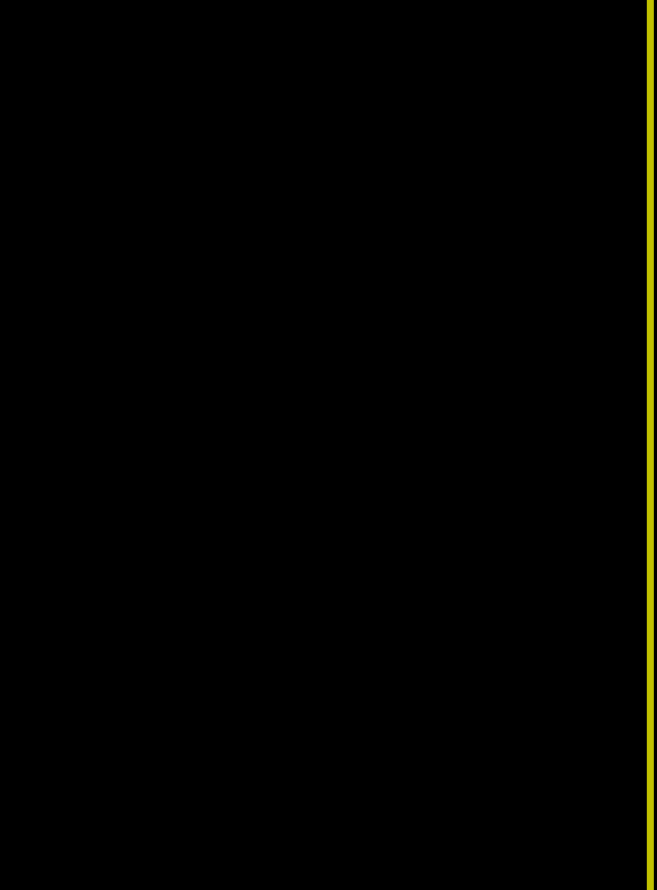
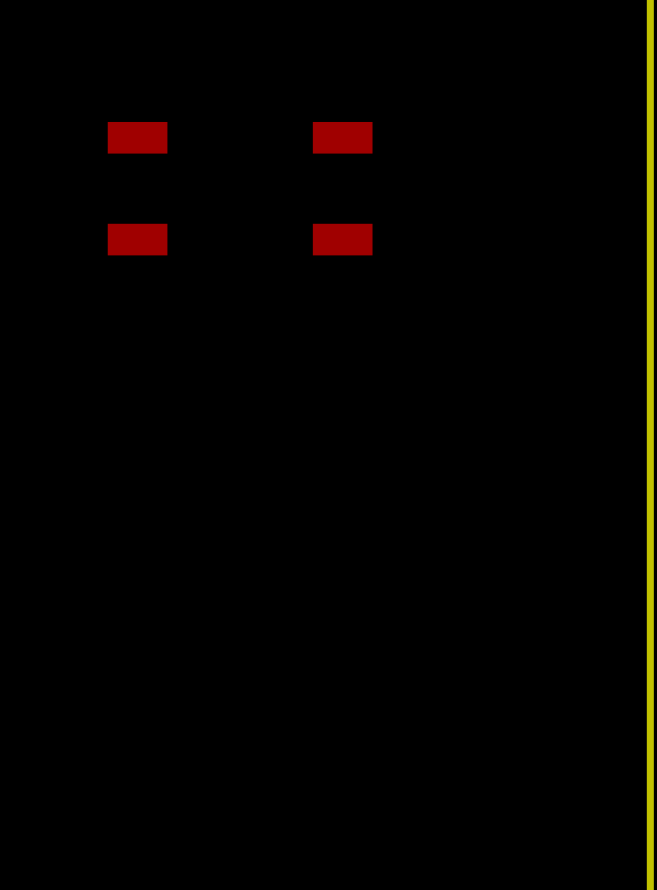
part: none -> (137, 188)
part: none -> (342, 188)

